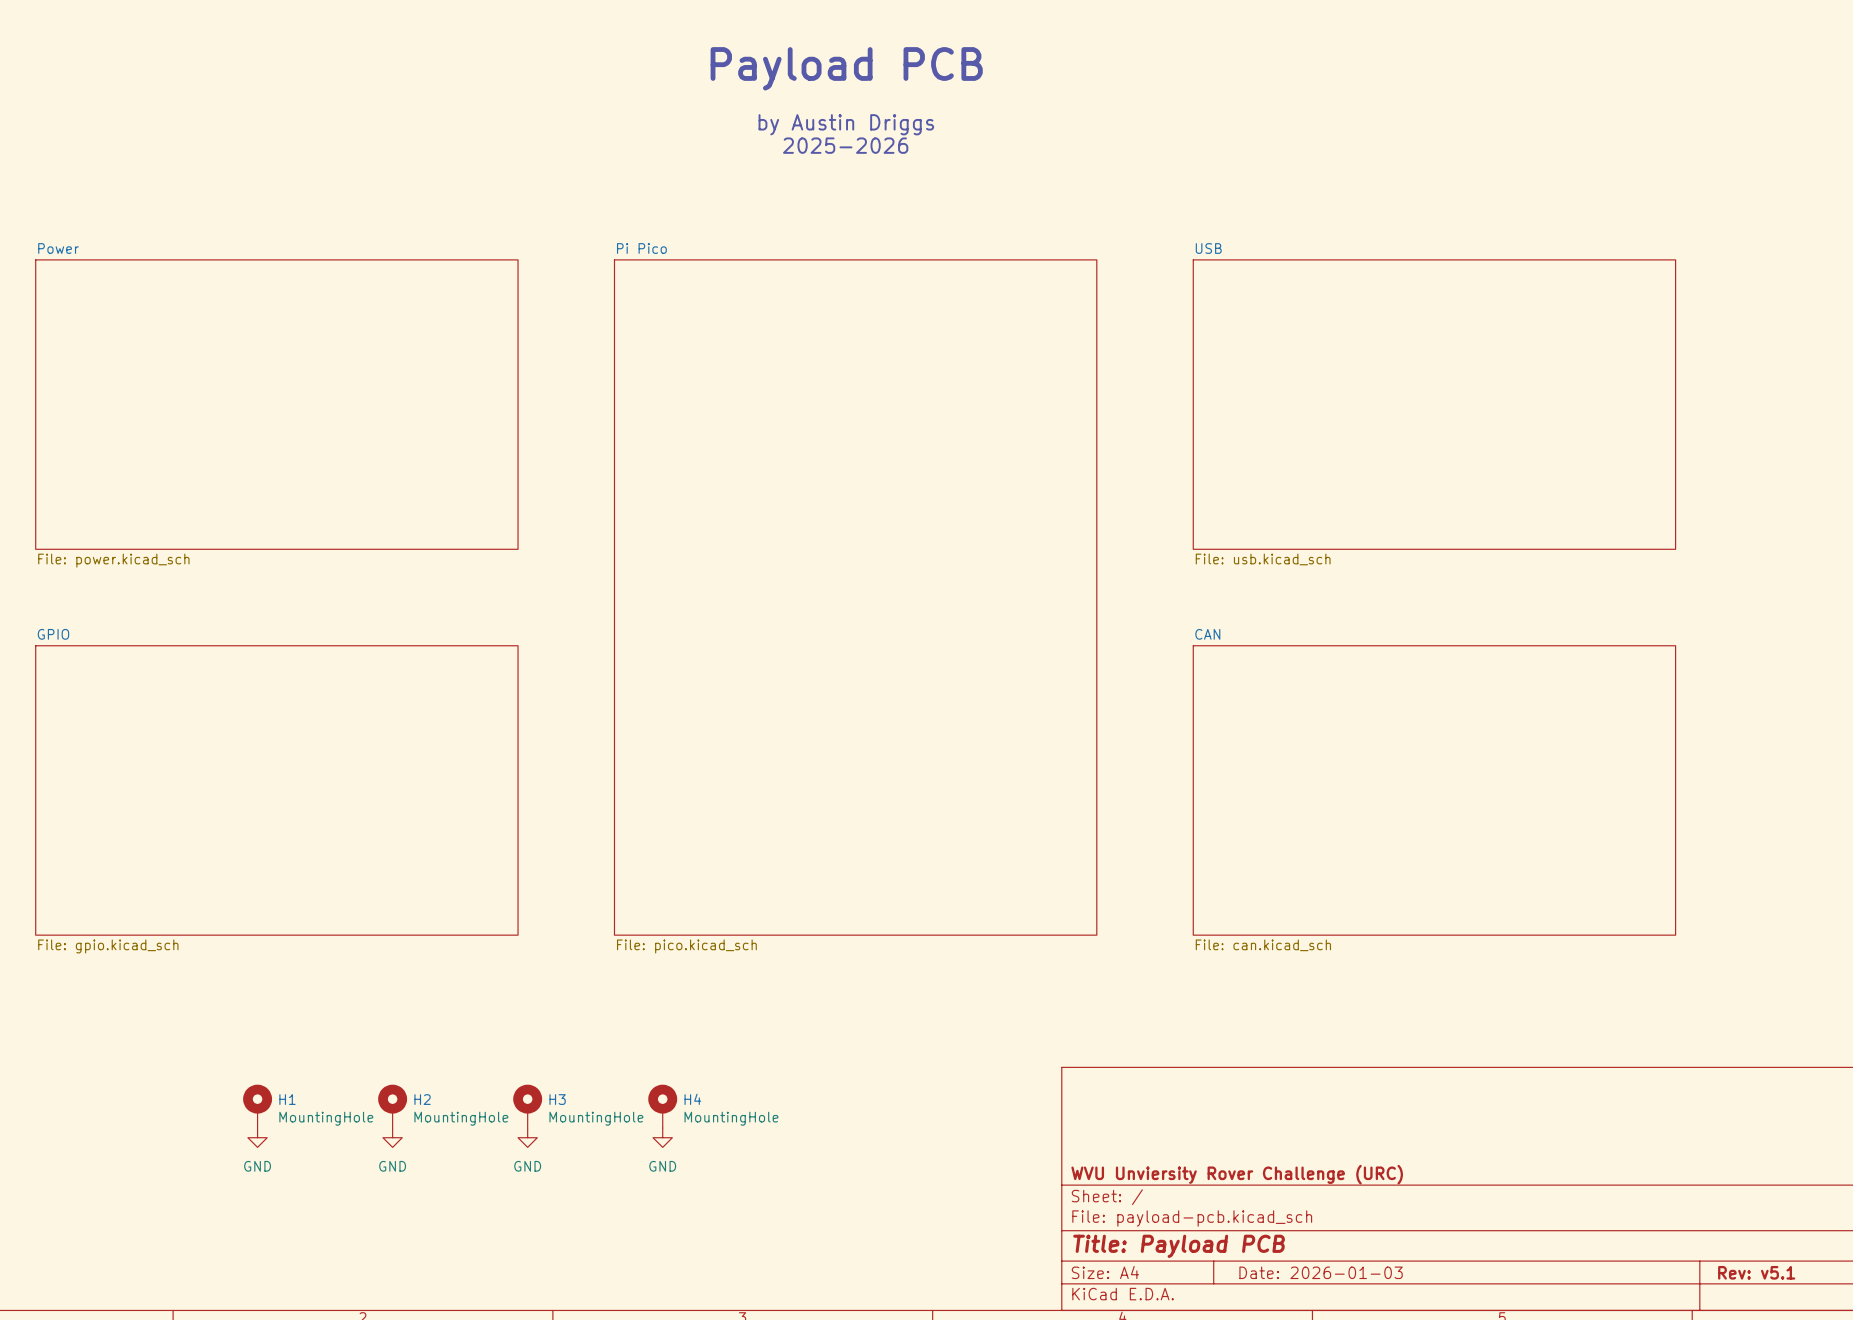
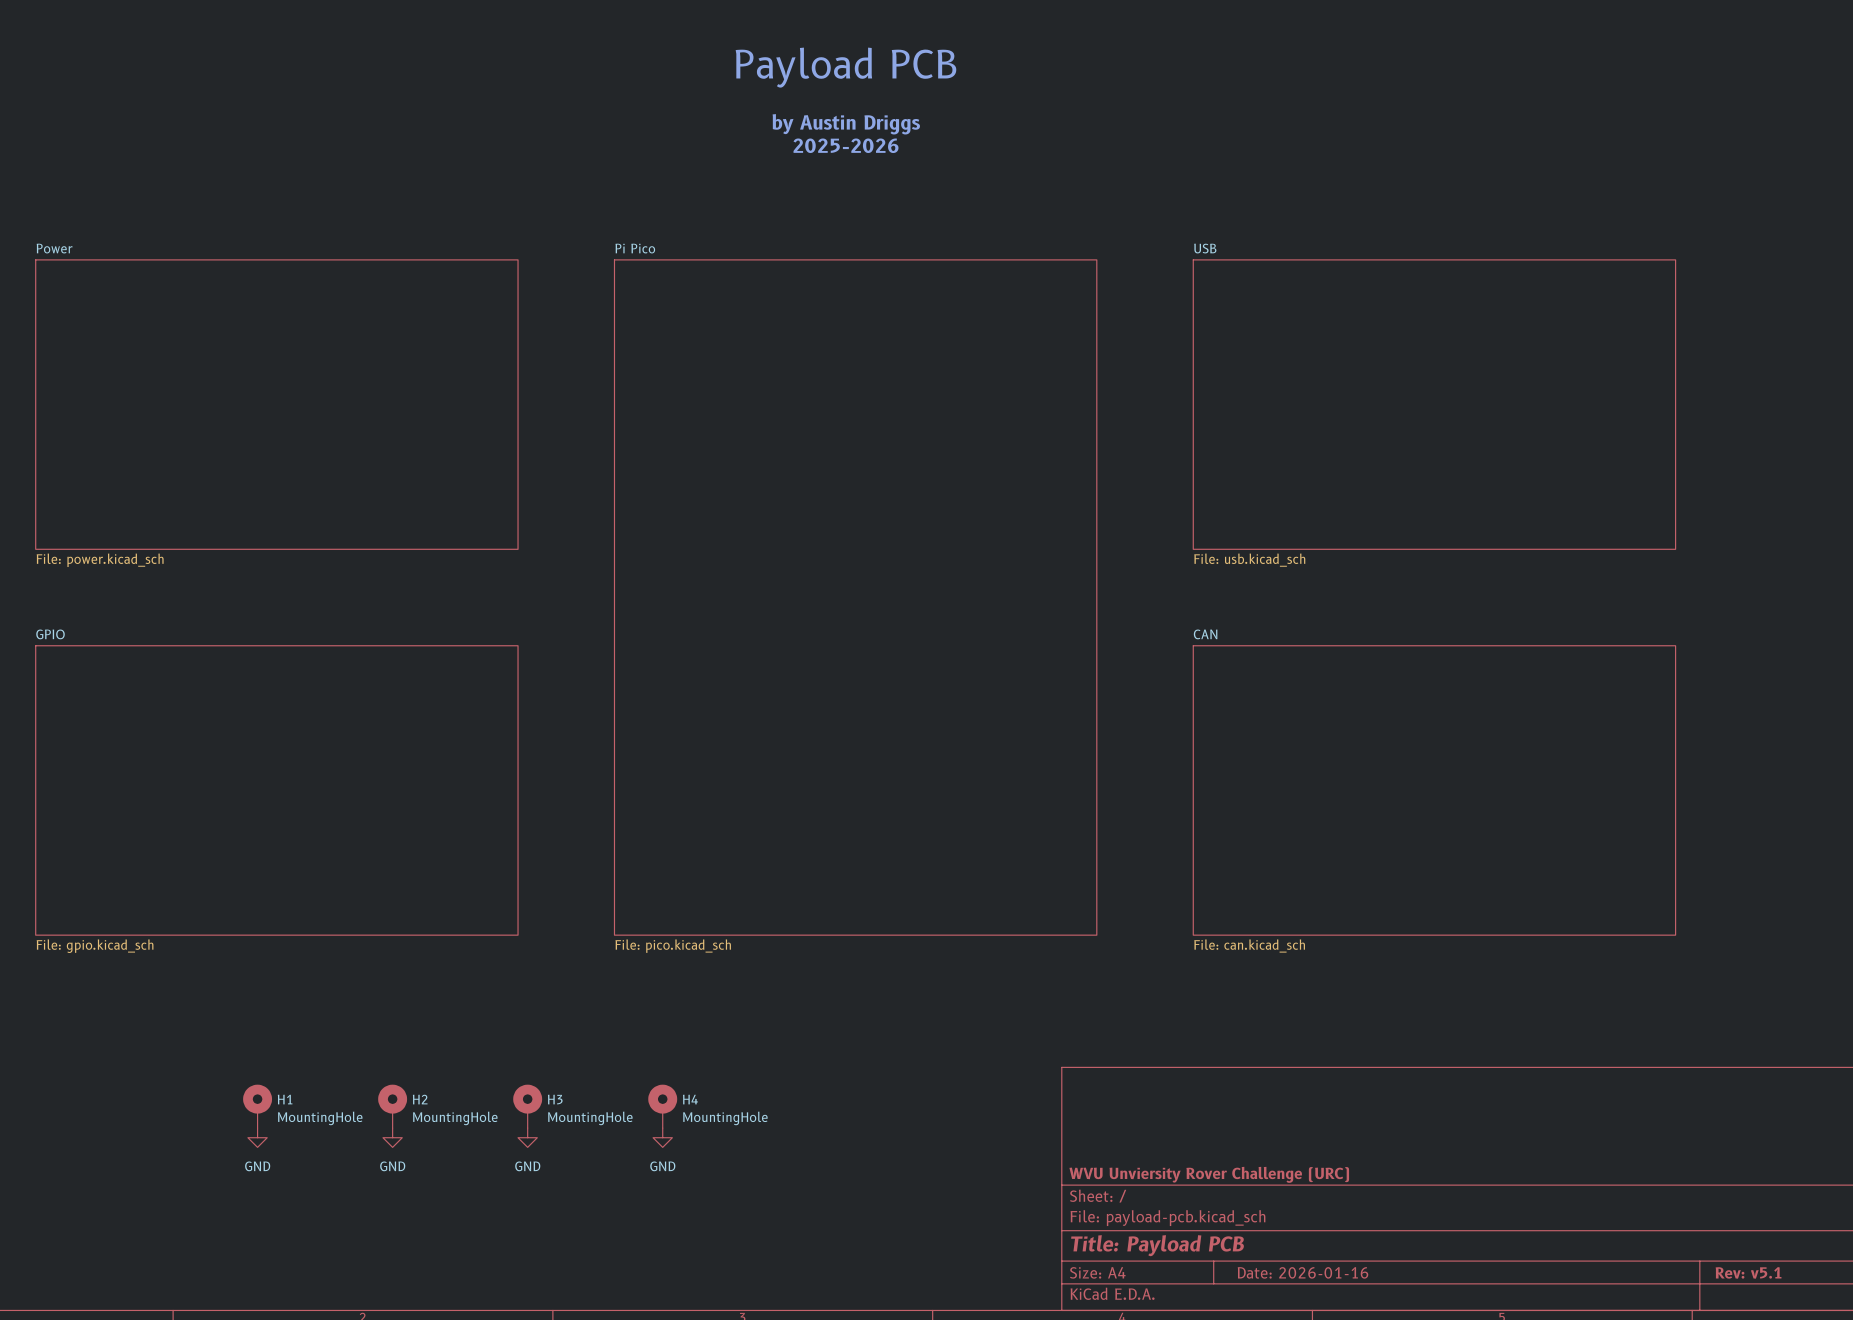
title block: Date: 2026-01-03 (1321, 1272) -> Date: 2026-01-16 (1303, 1272)

